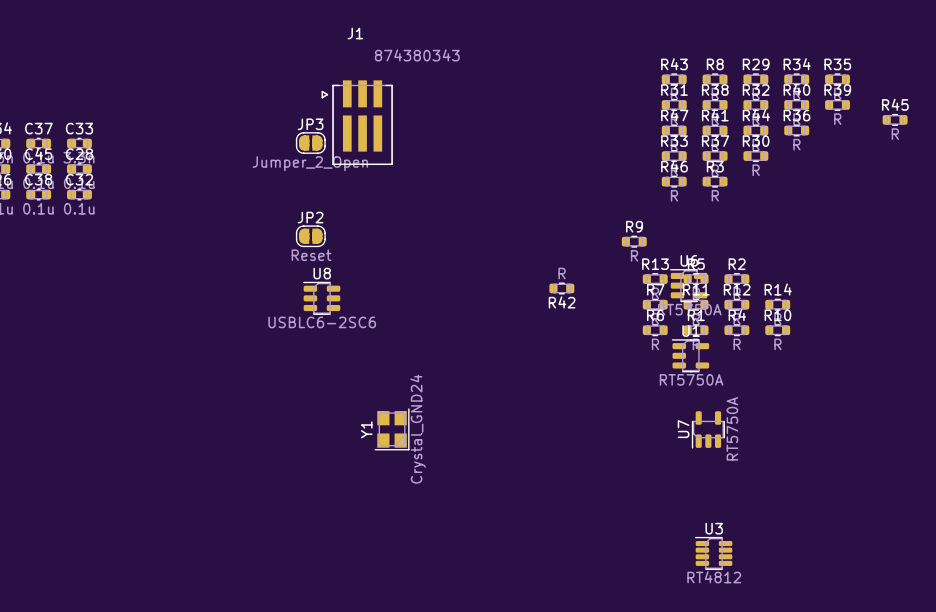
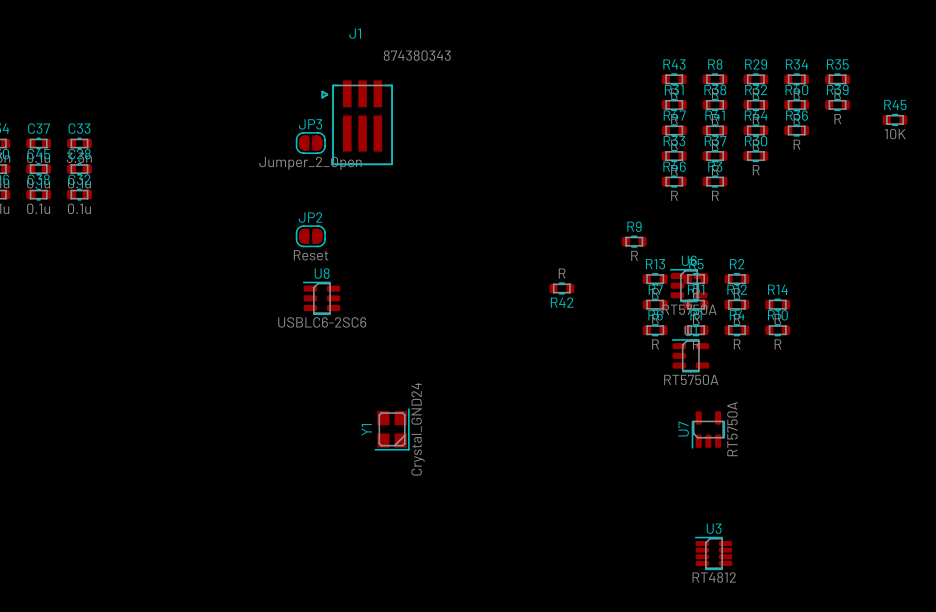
R45 value: R (895, 134) -> 10K (895, 134)

